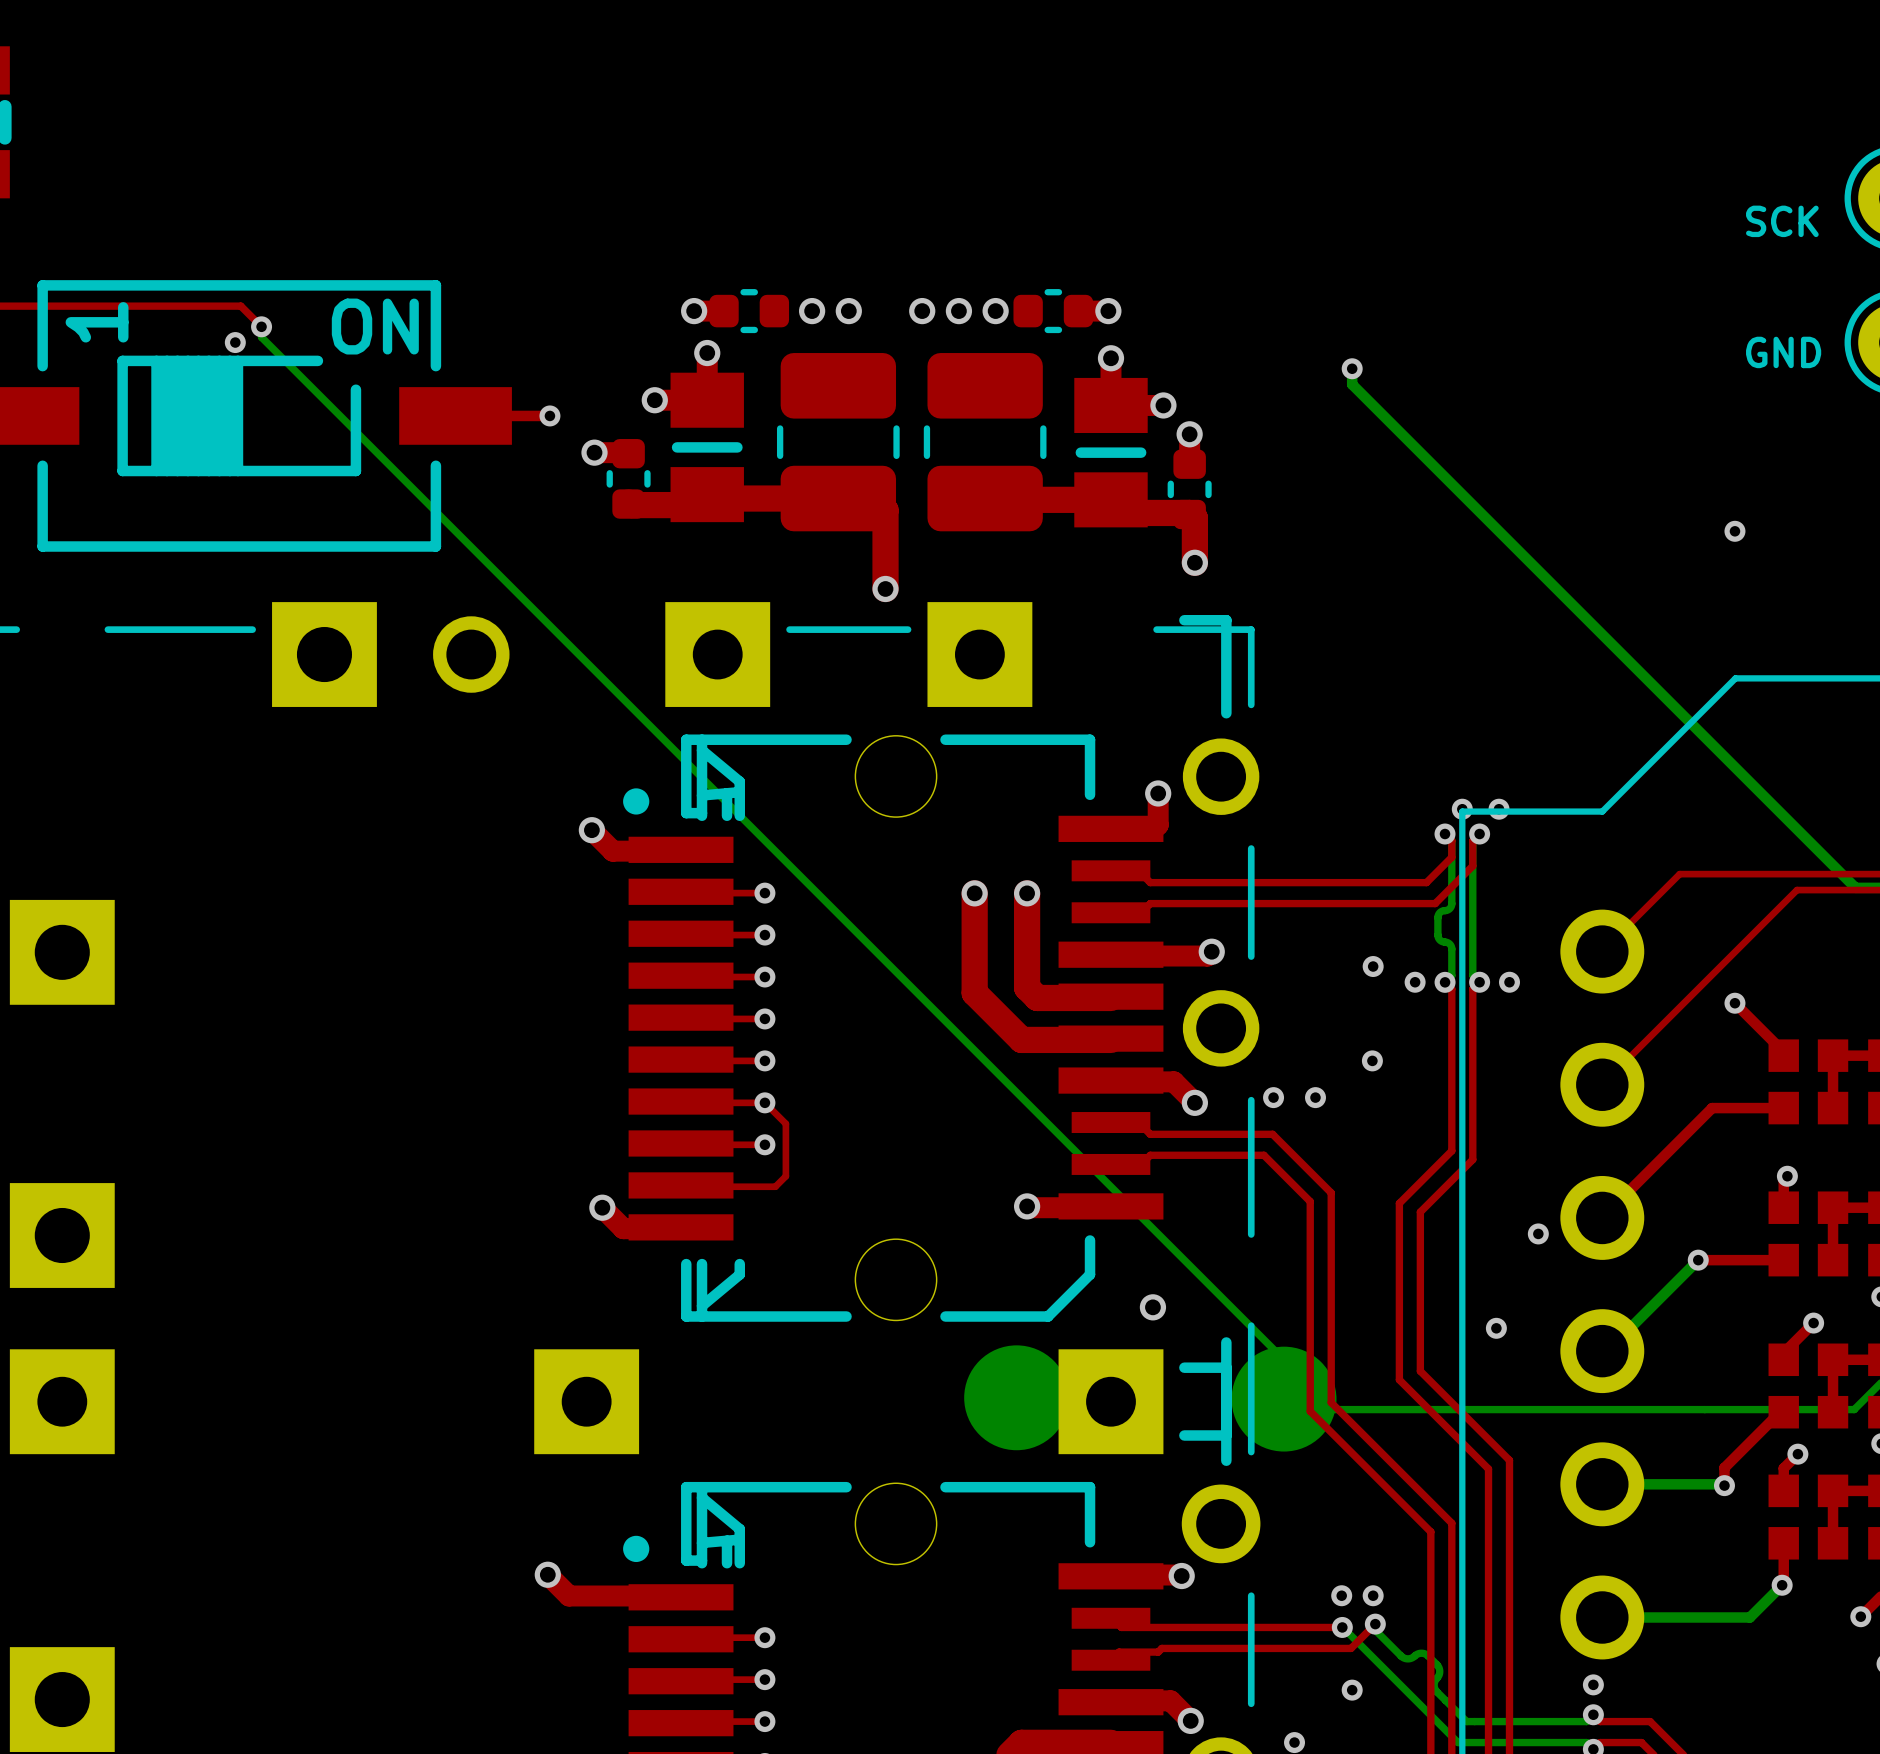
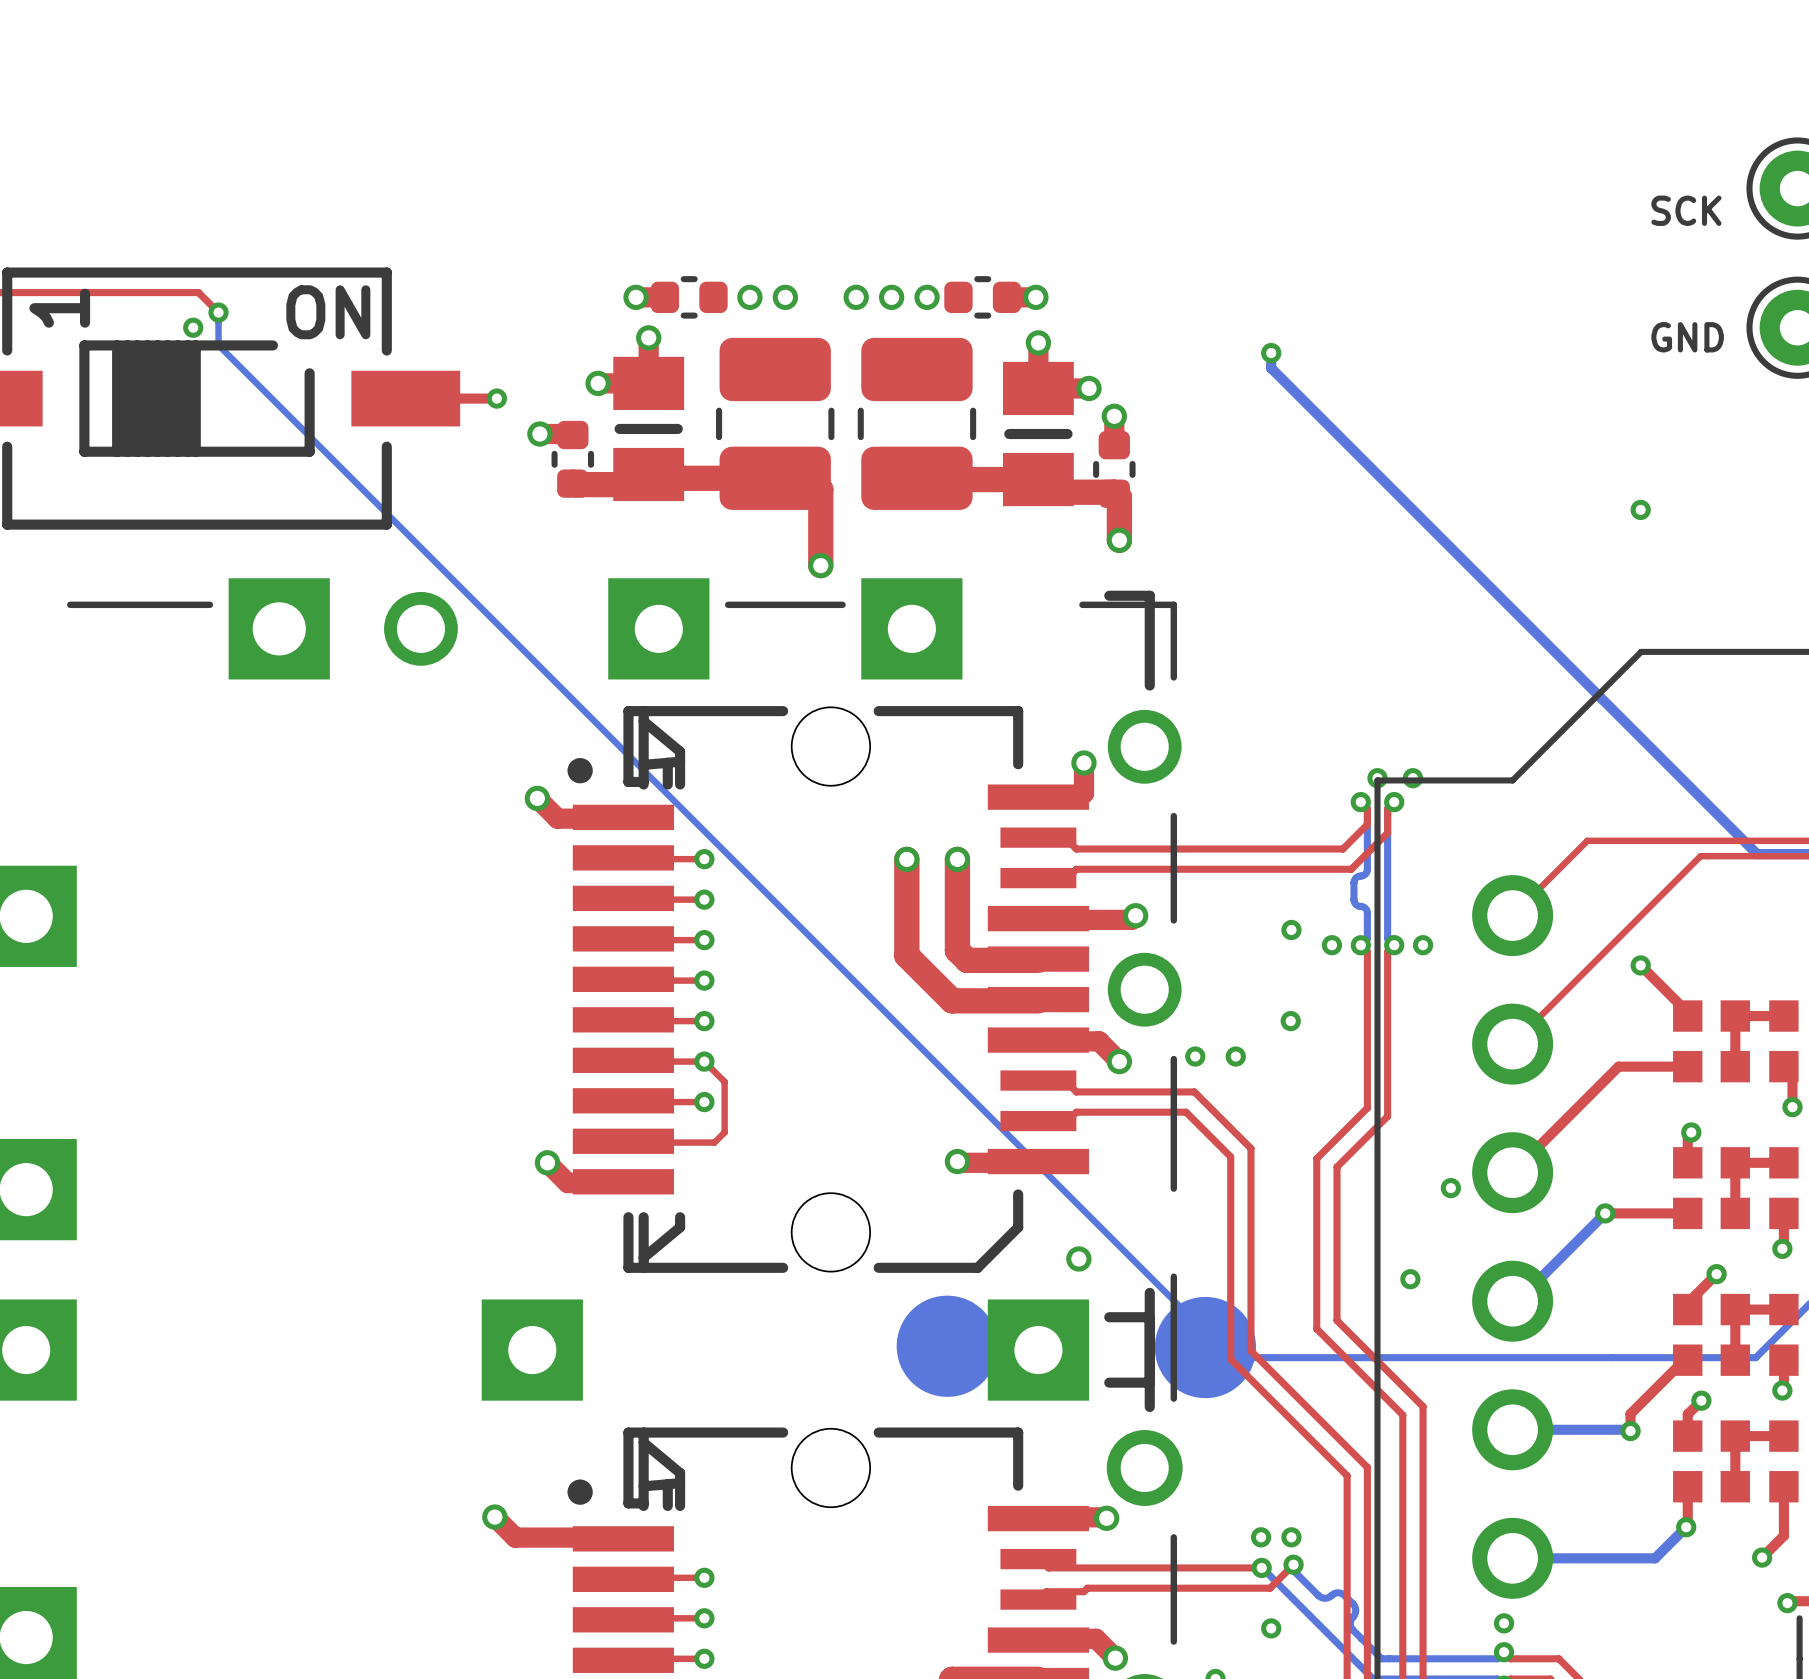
bottom track: (261, 337) (1284, 1359) (1284, 1383) -> (218, 322) (218, 345) (1205, 1332)

